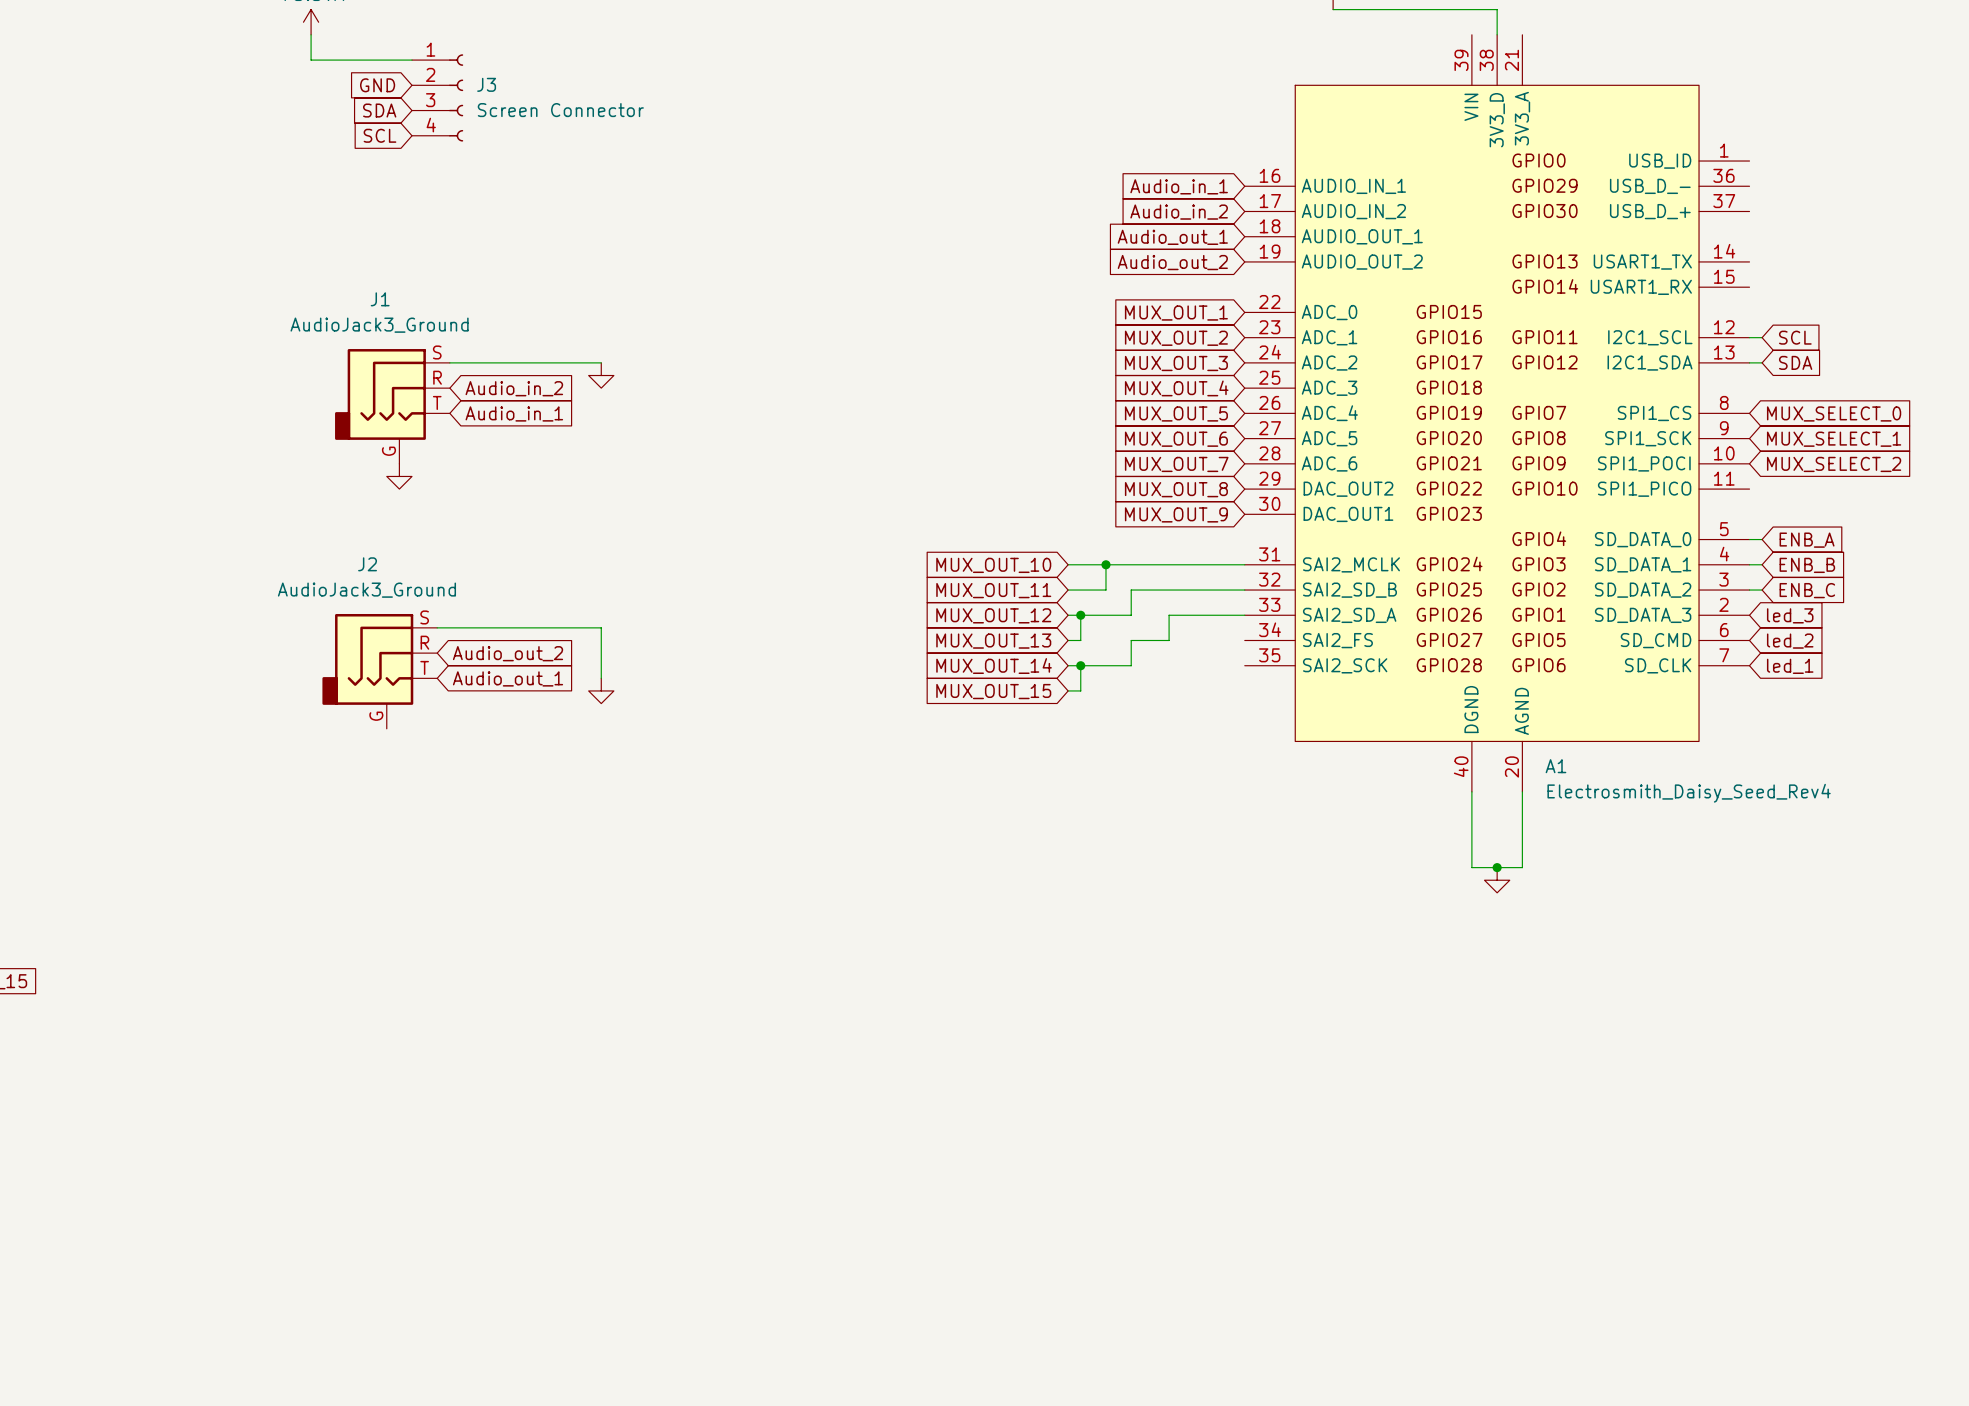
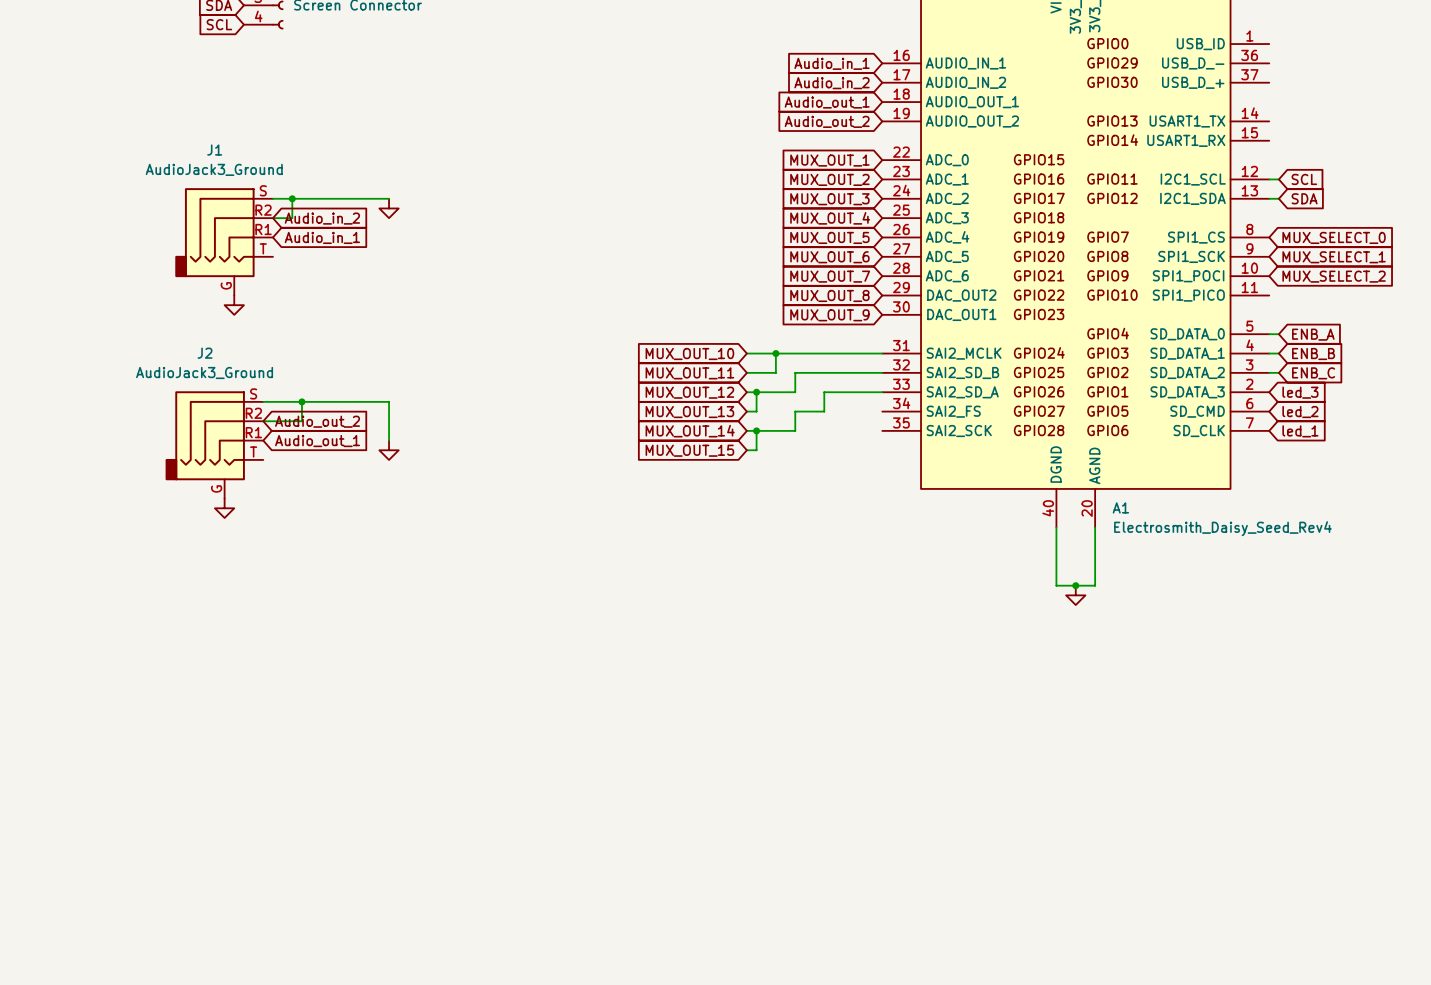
J1 symbol: [335, 349, 450, 464] -> [175, 188, 273, 296]
wire: none -> (292, 198) (292, 218) (272, 218)
junction: none -> (292, 198)
power symbol position: (399, 476) -> (234, 305)
J2 symbol: [322, 613, 438, 729] -> [165, 391, 264, 499]
wire: none -> (301, 401) (301, 421) (263, 421)
junction: none -> (301, 401)
power symbol: none -> (224, 508)

